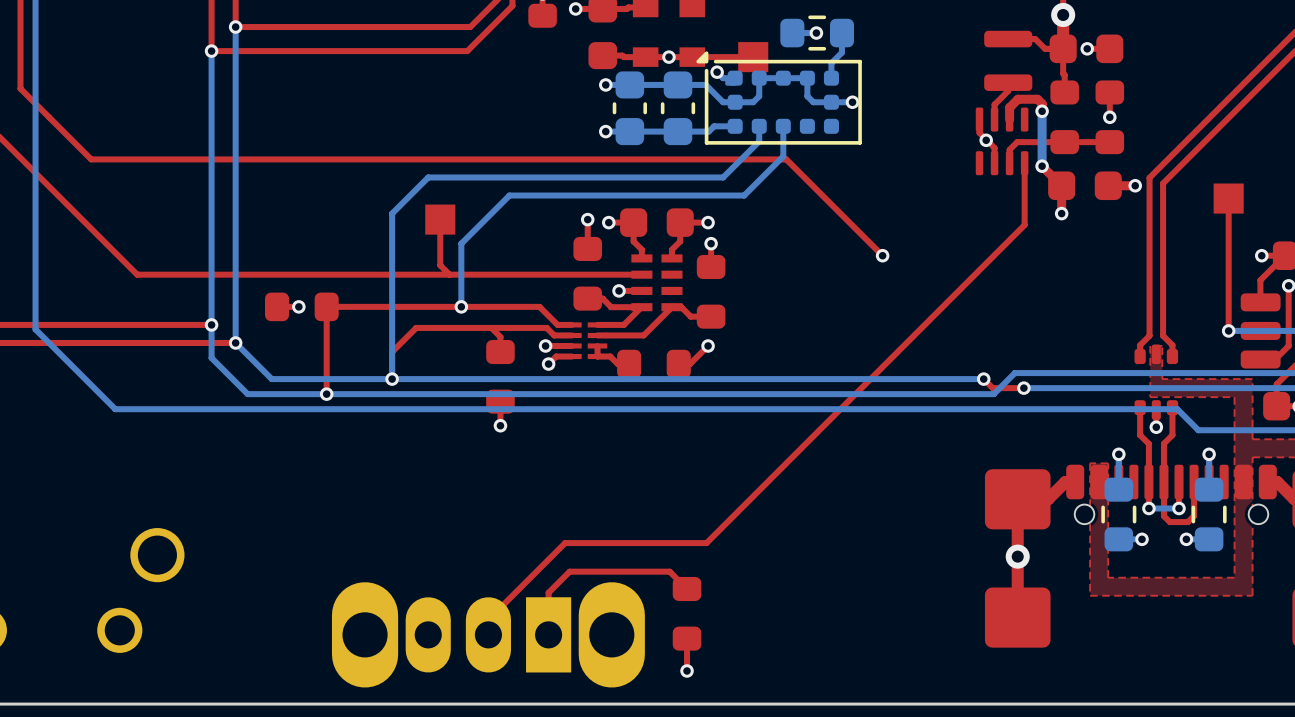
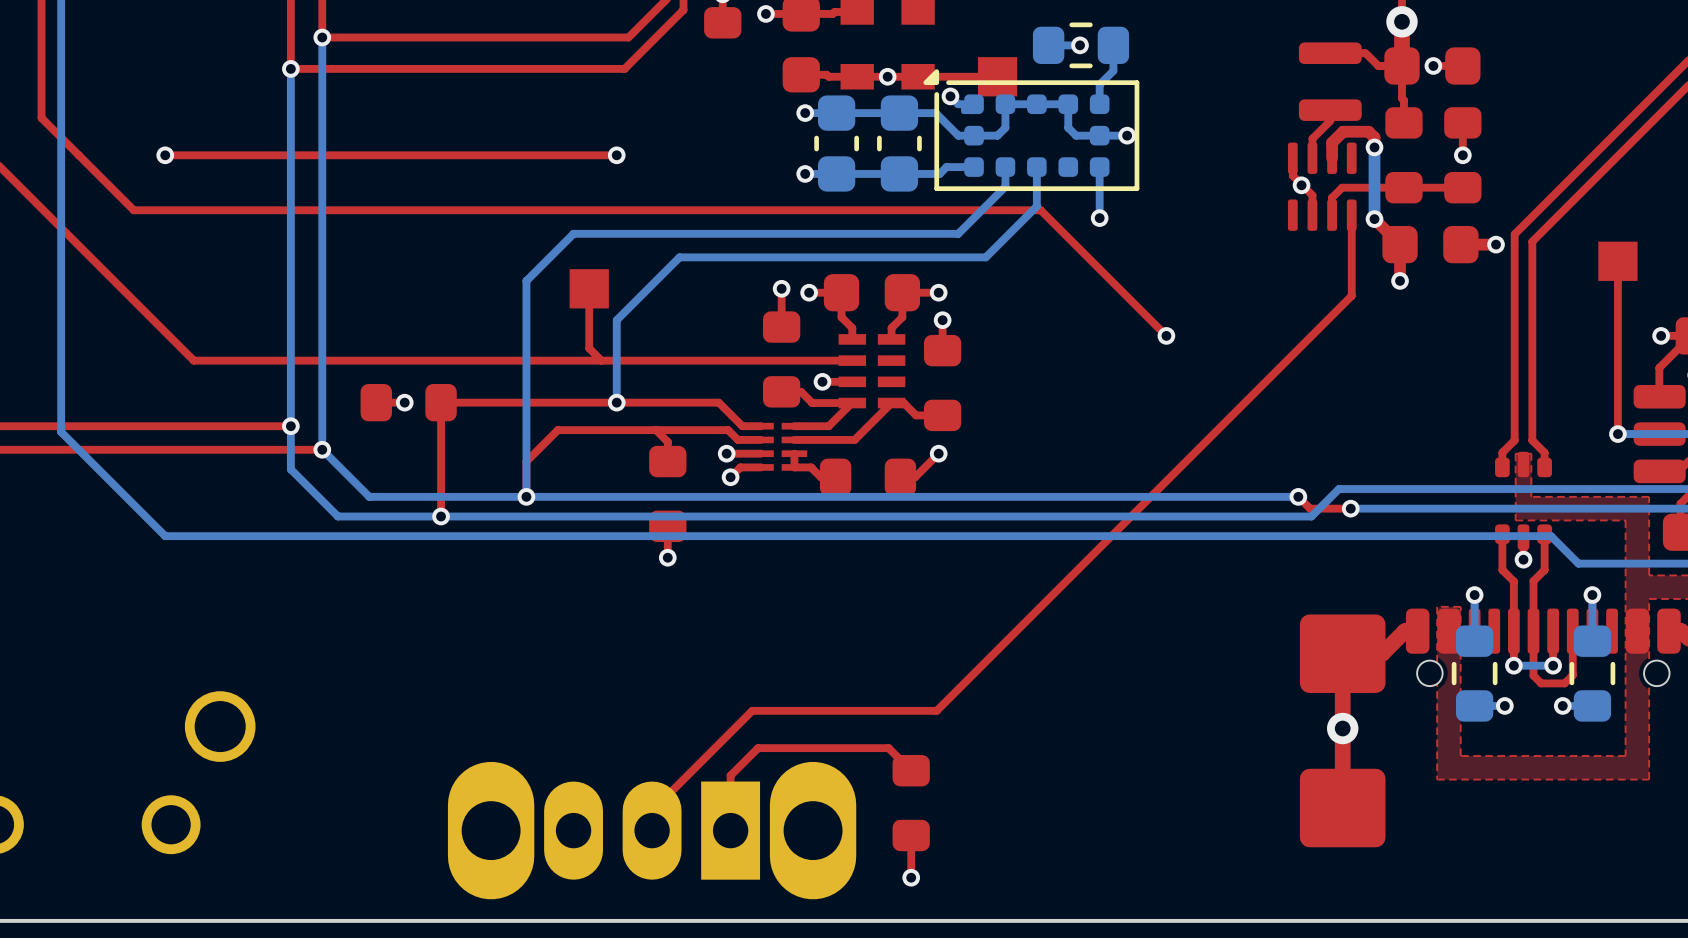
via: none -> (165, 155)
top track: none -> (616, 155) (165, 155)
via: none -> (616, 155)
bottom track: none -> (1099, 167) (1099, 218)
via: none -> (1099, 218)

